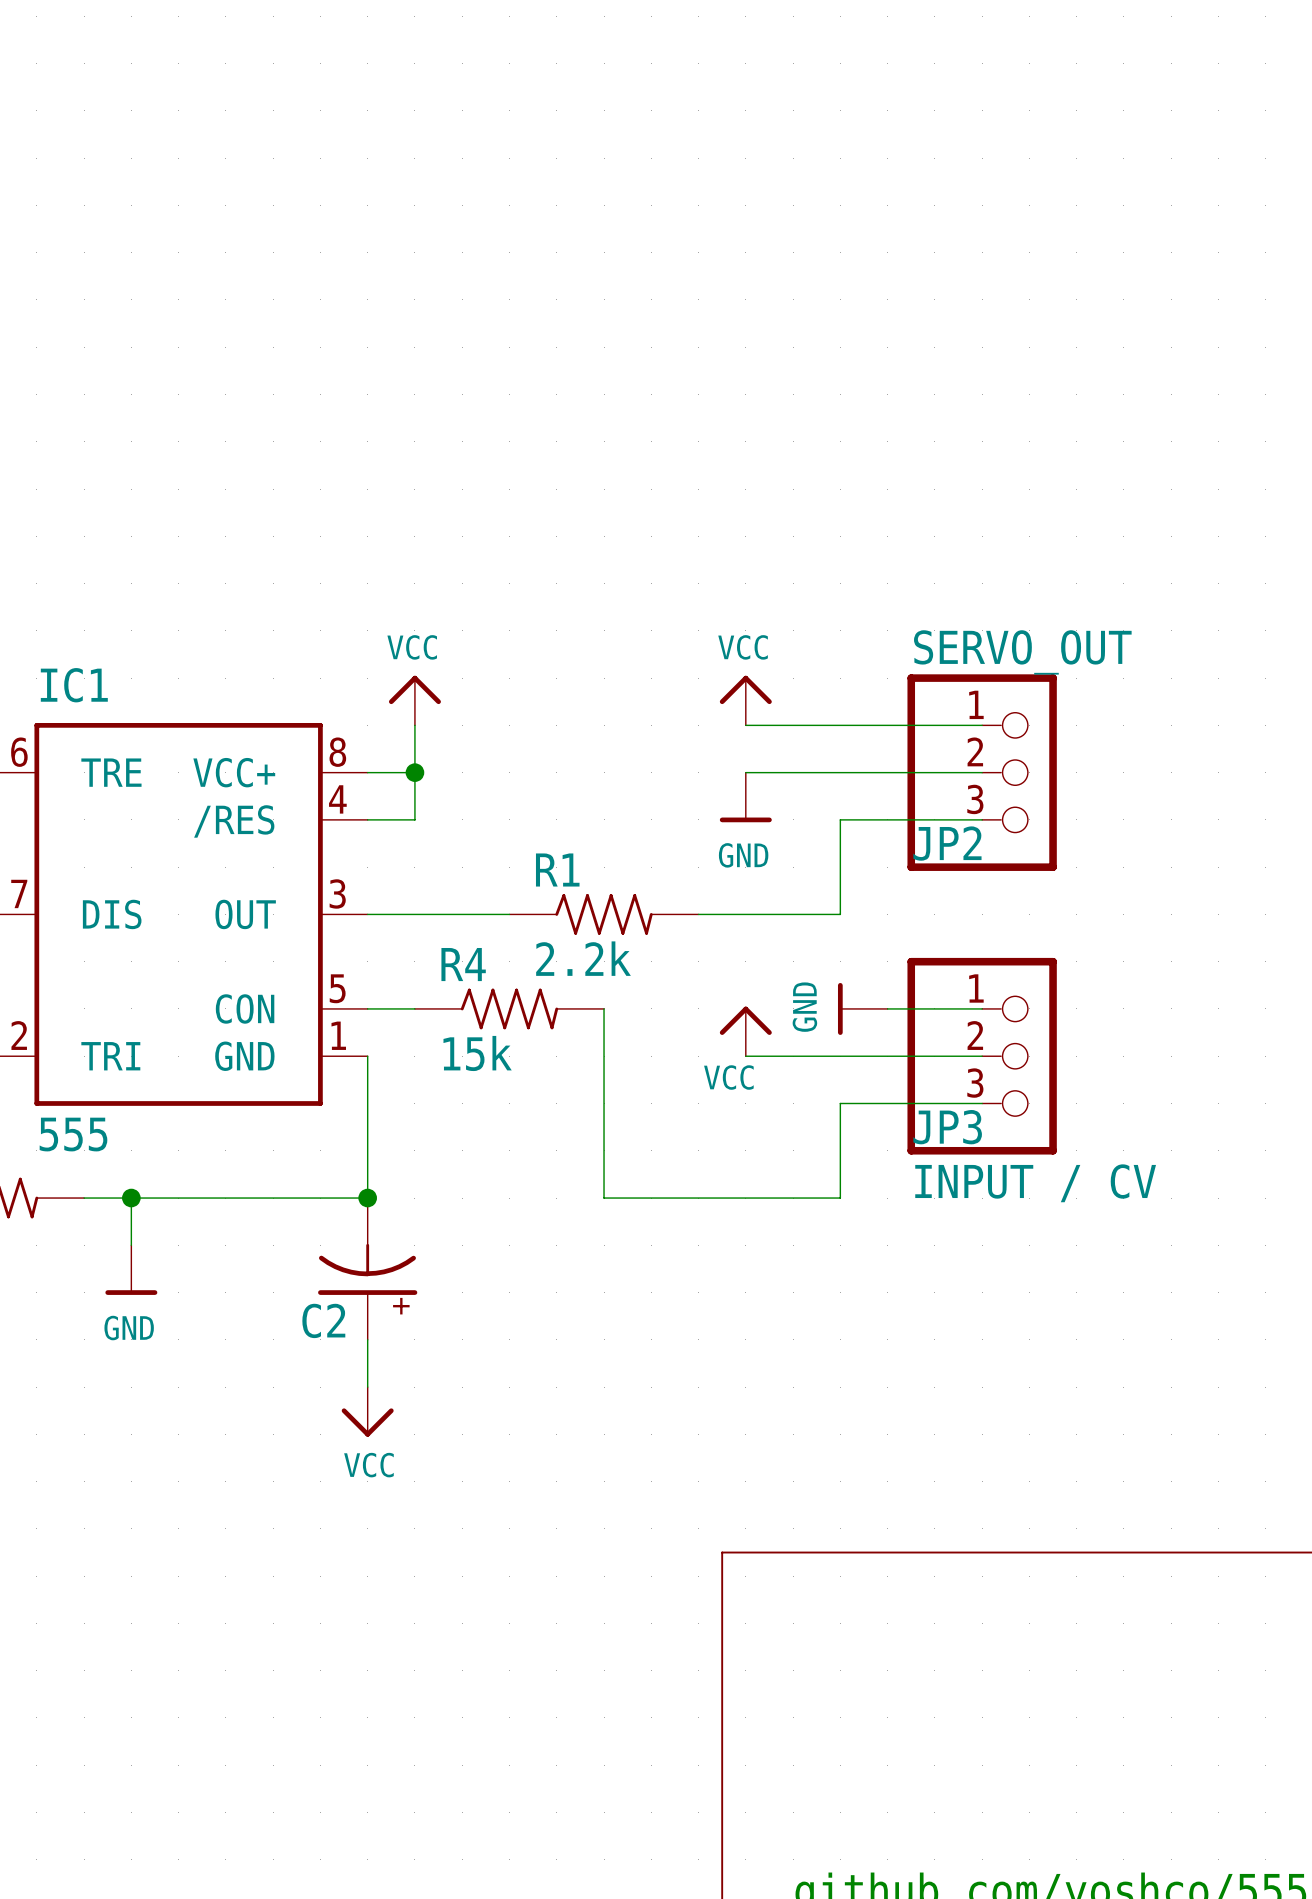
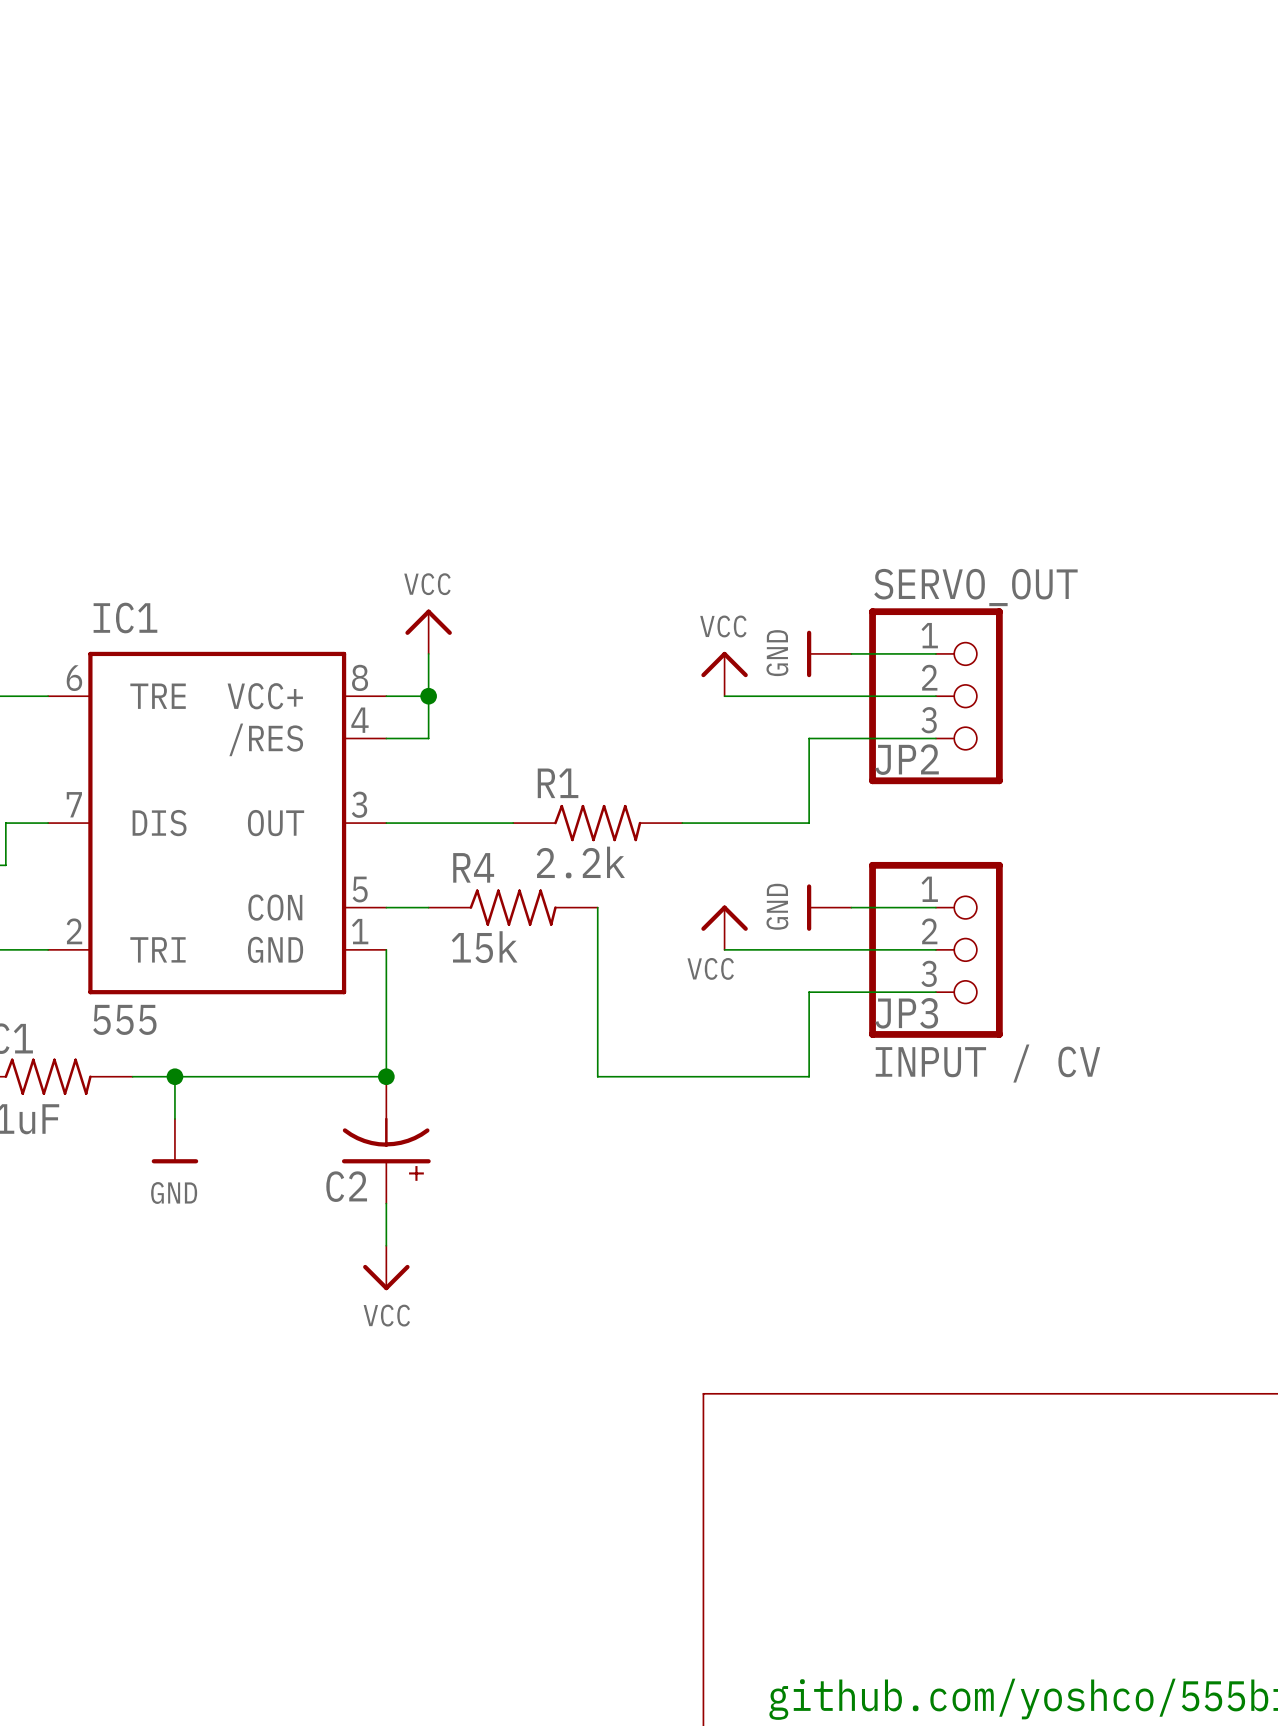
power symbol position: VCC (745, 700) -> VCC (724, 674)
wire: (745, 725) (887, 725) -> none
power symbol position: GND (745, 797) -> GND (829, 653)
power symbol rotation: 0° (745, 819) -> 90° clockwise (809, 653)

